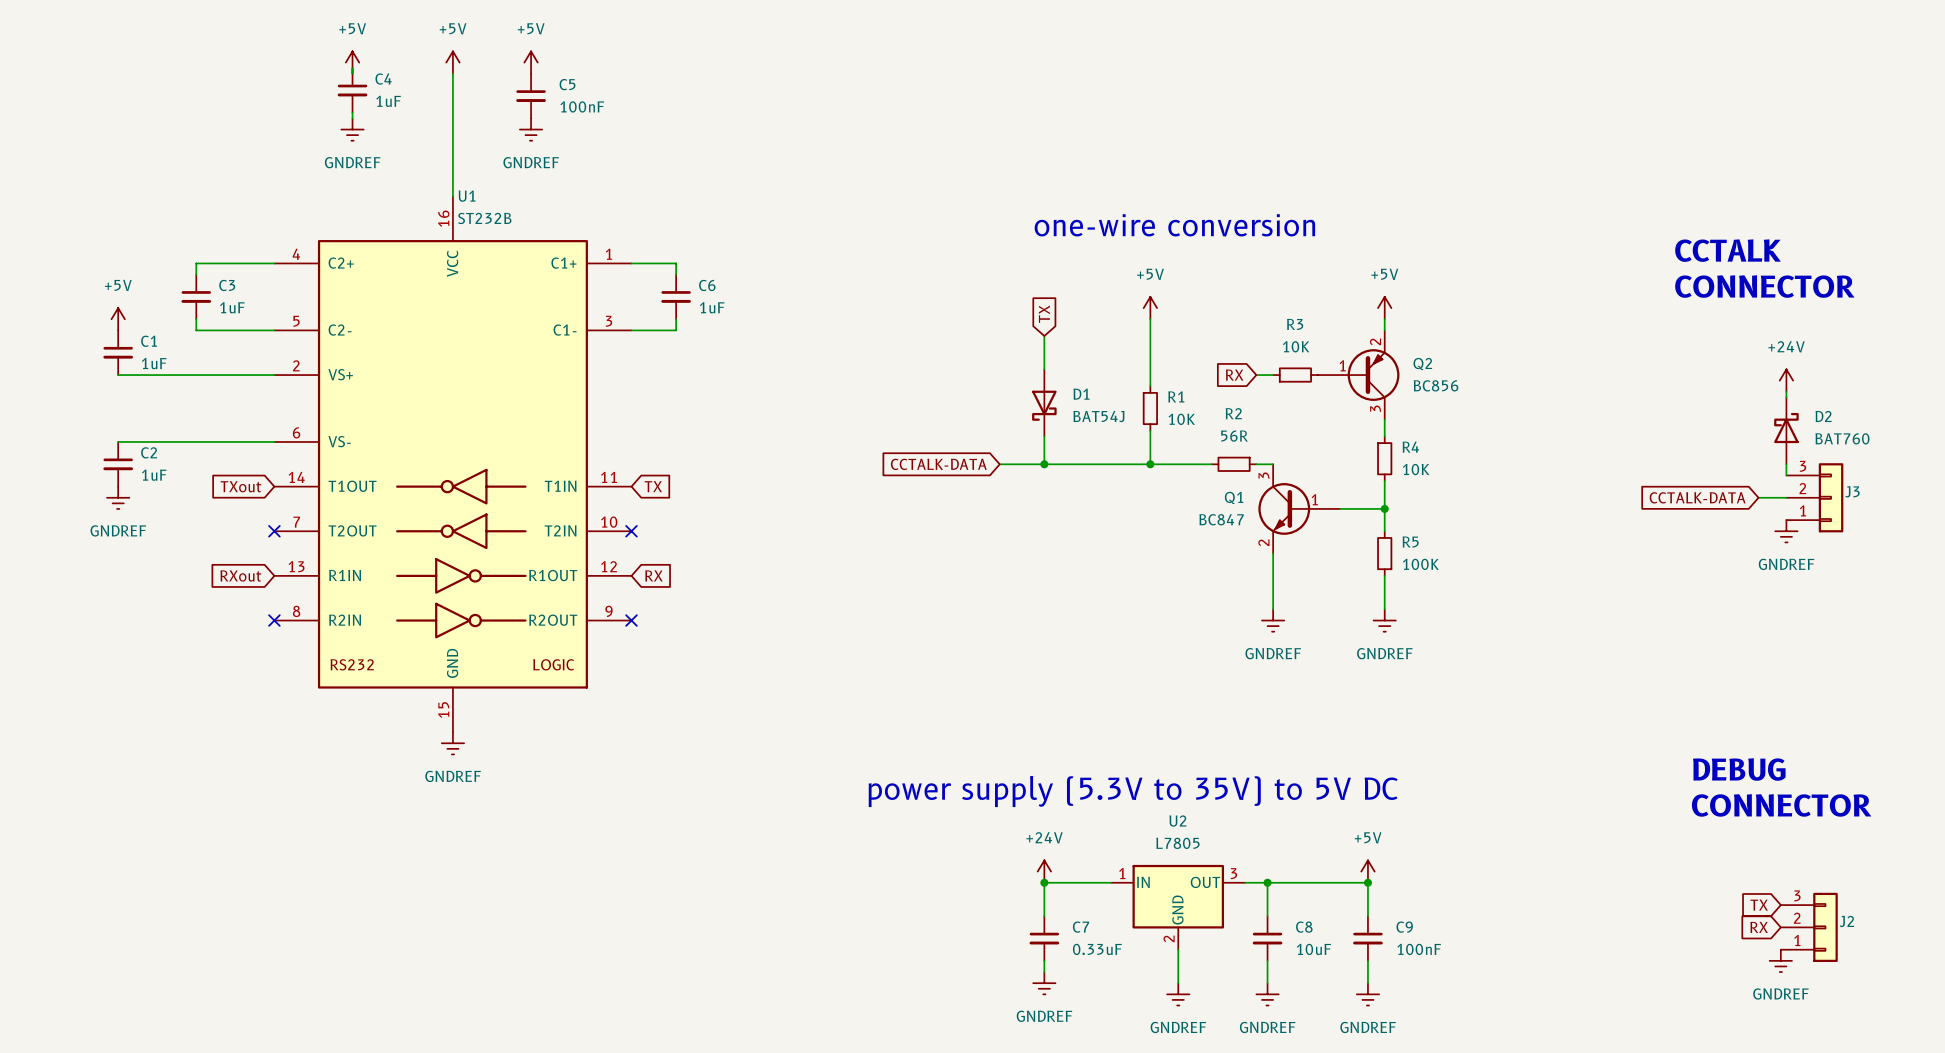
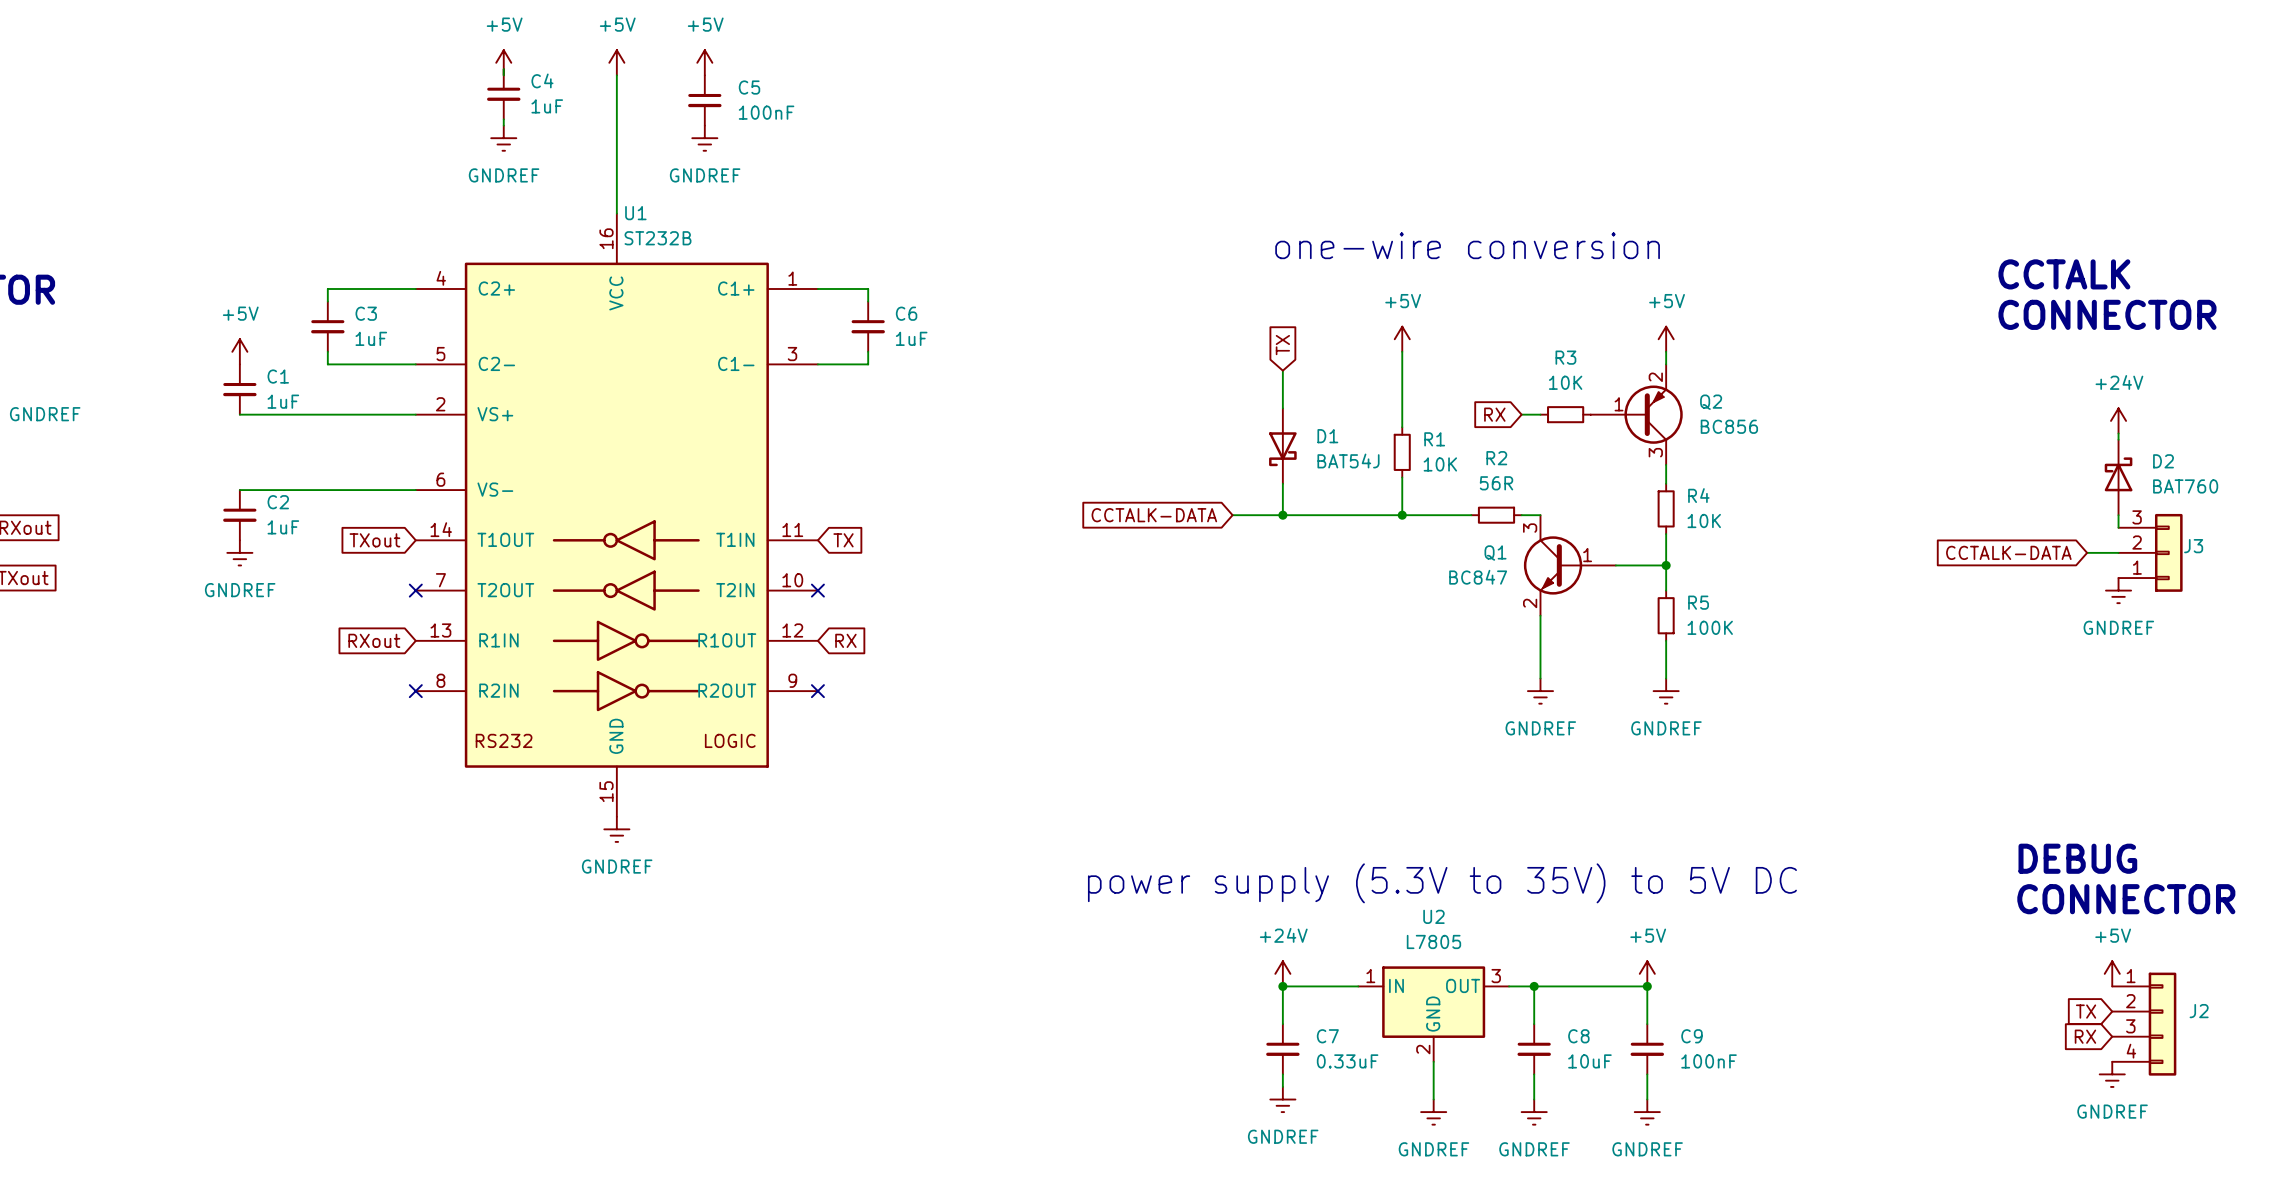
power symbol: none -> +5V (2112, 973)
J2 symbol: [1780, 892, 1838, 962] -> [2112, 972, 2177, 1076]

